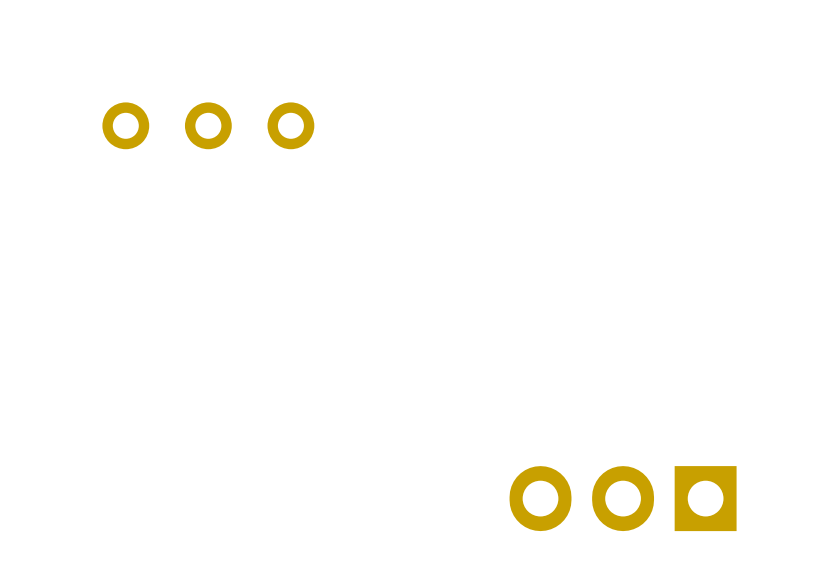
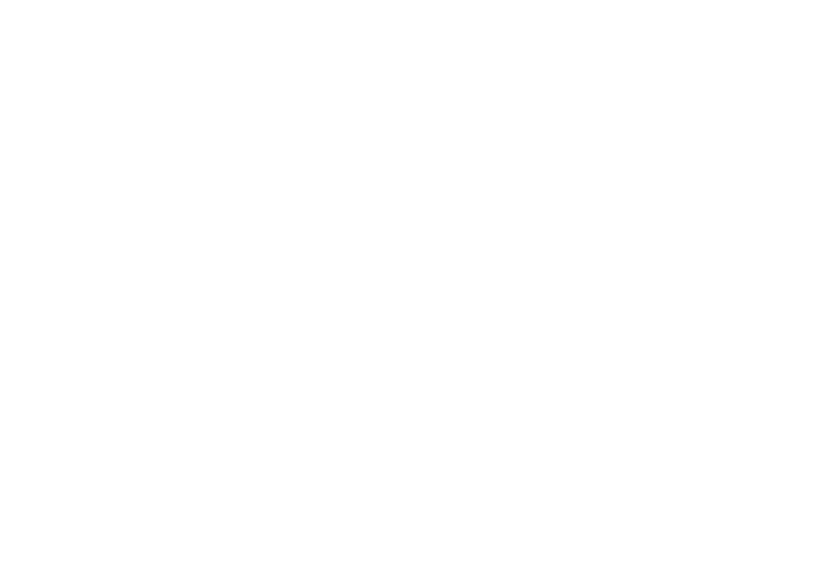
part: (208, 125) -> none
part: (623, 498) -> none

